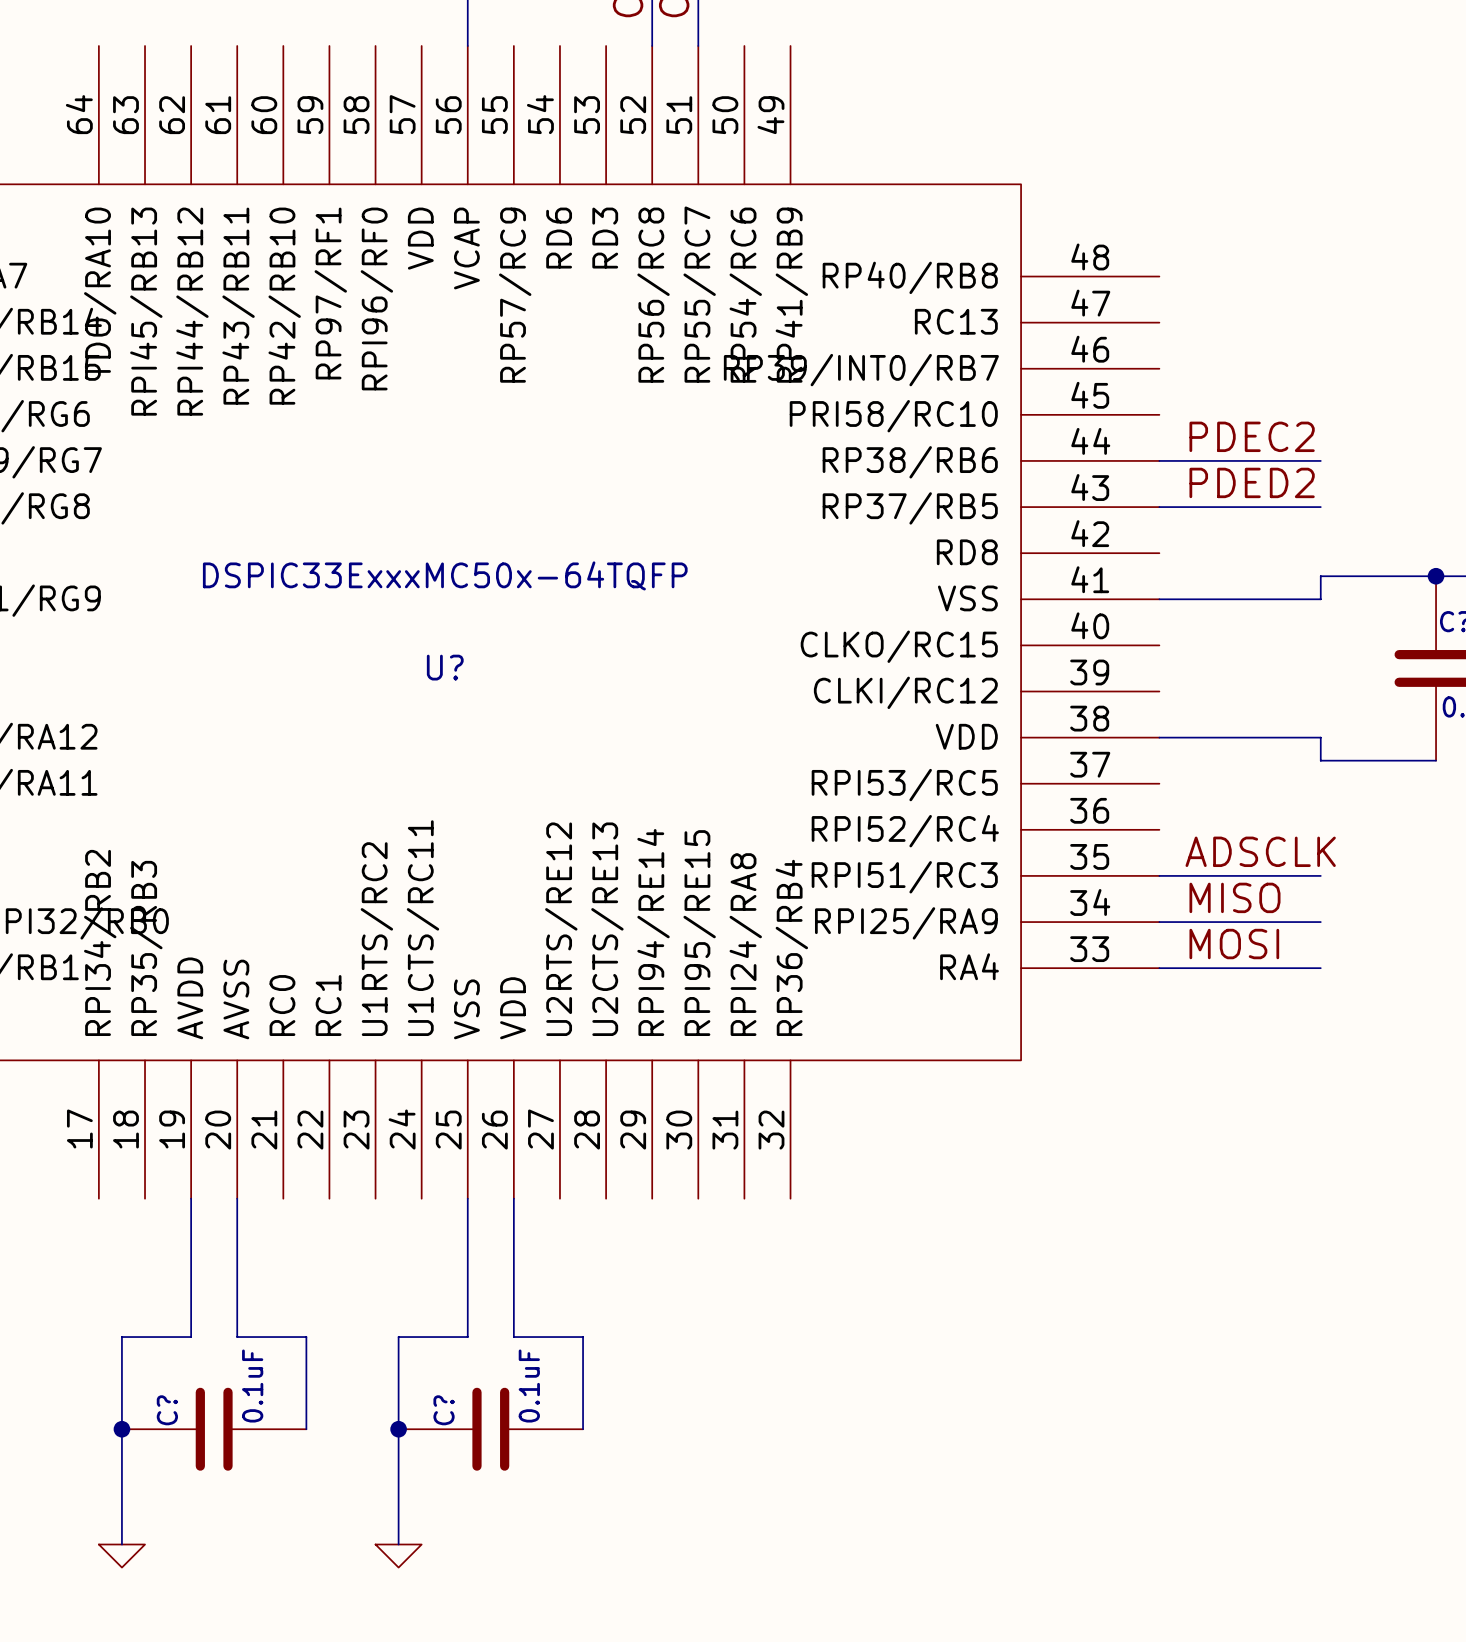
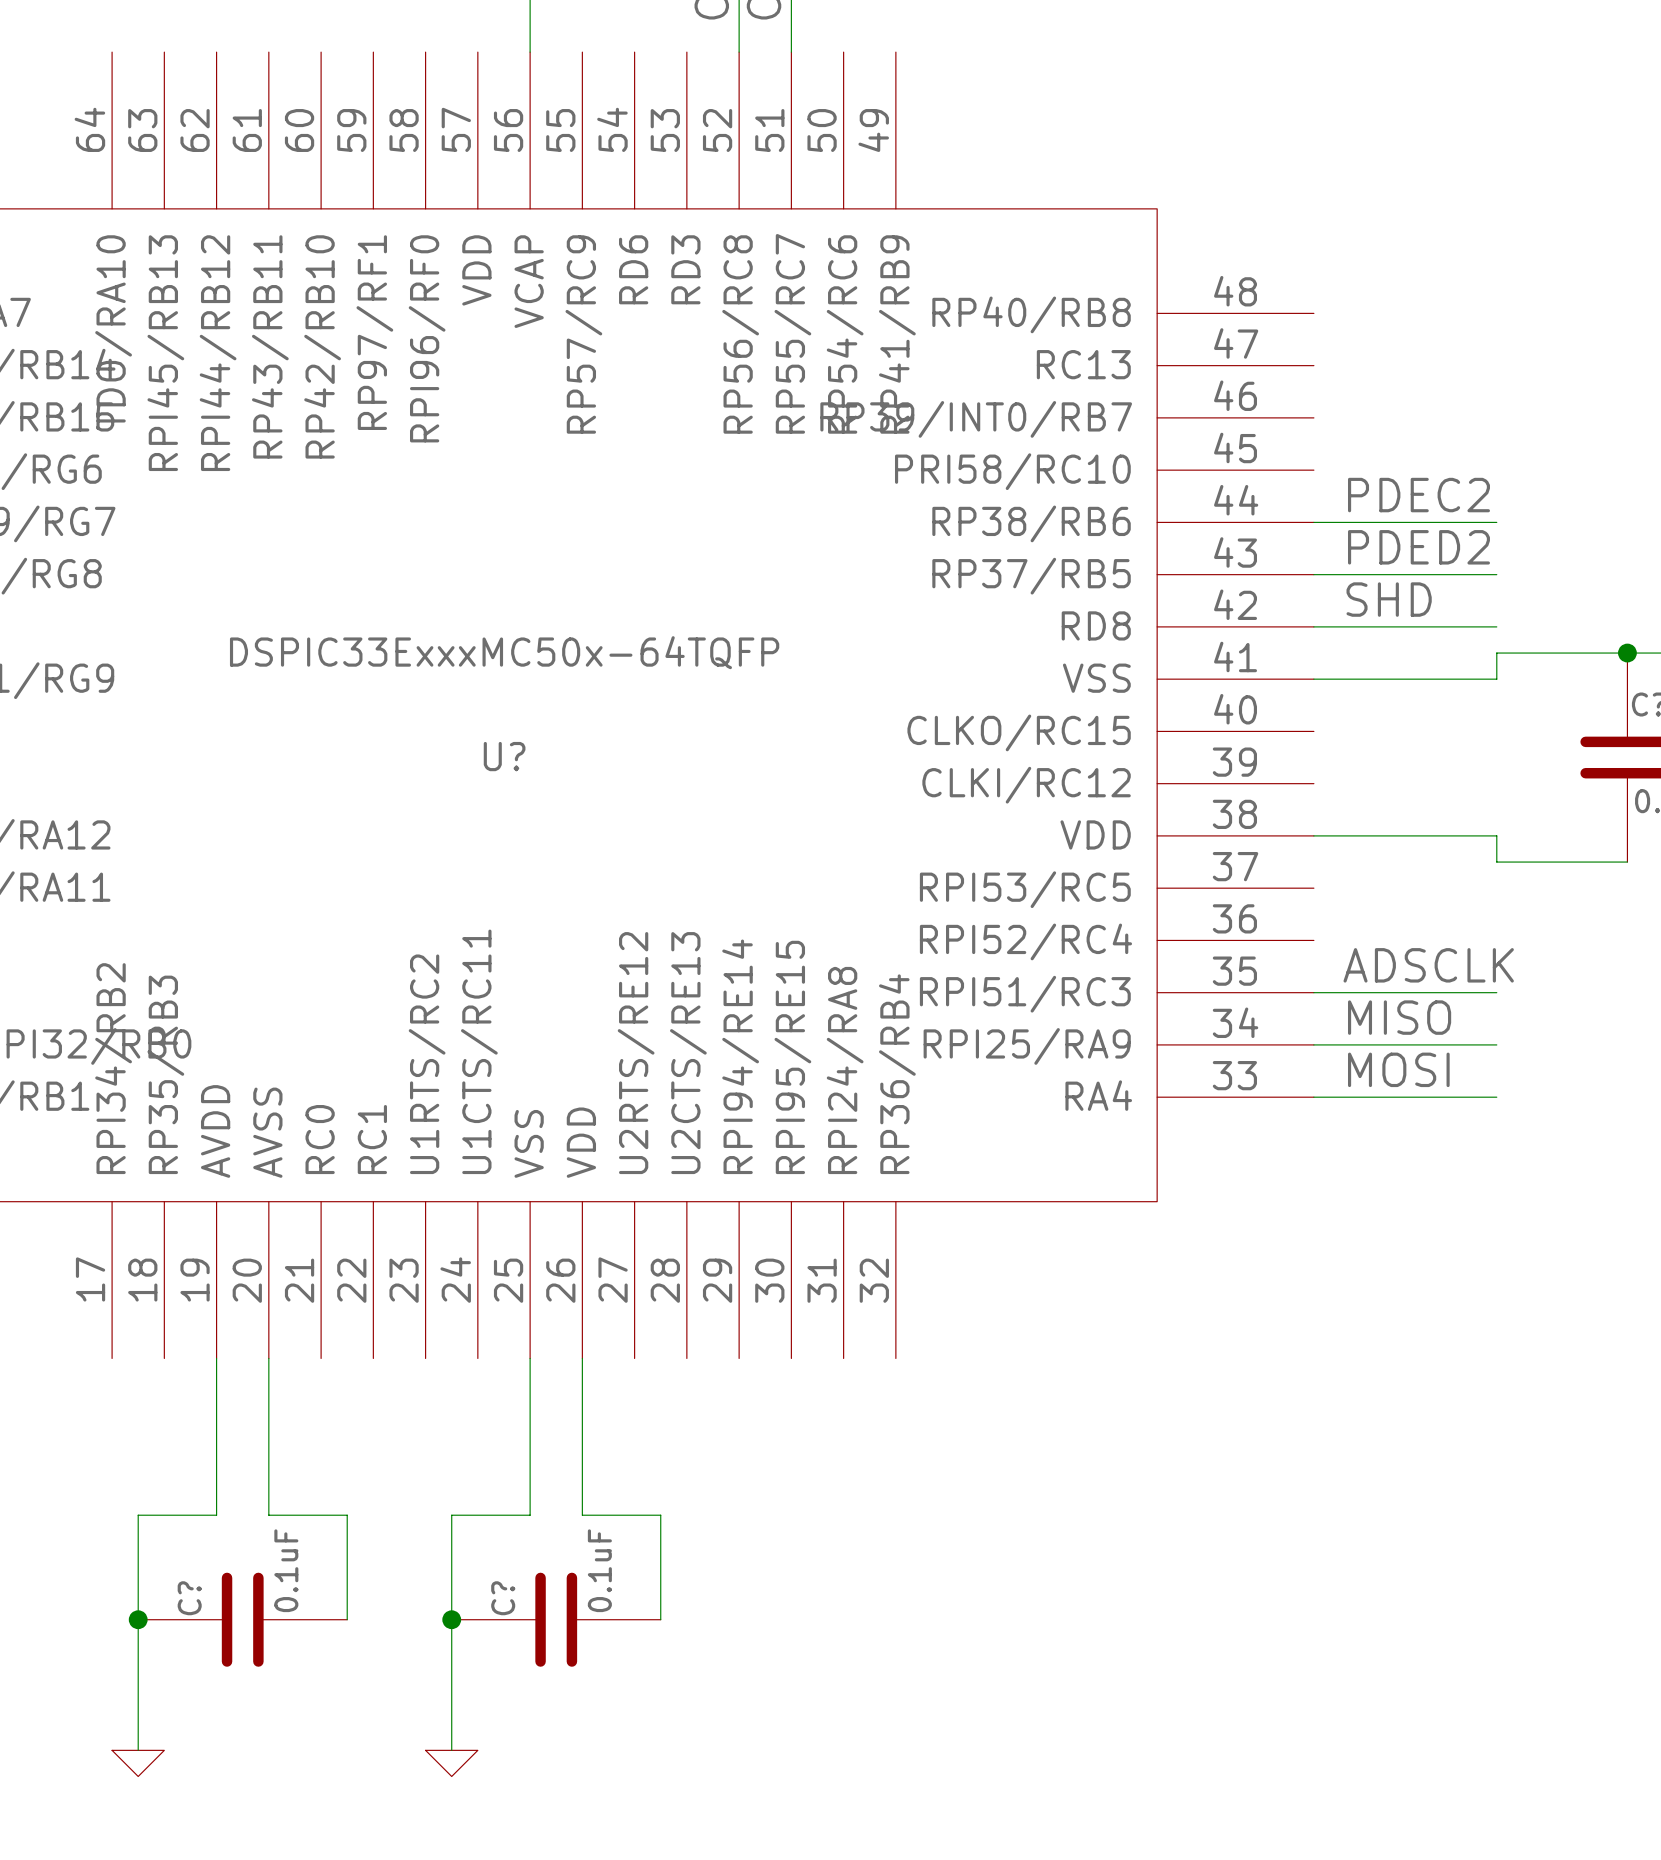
label: none -> SHD (1389, 599)
wire: none -> (1313, 626) (1496, 626)

